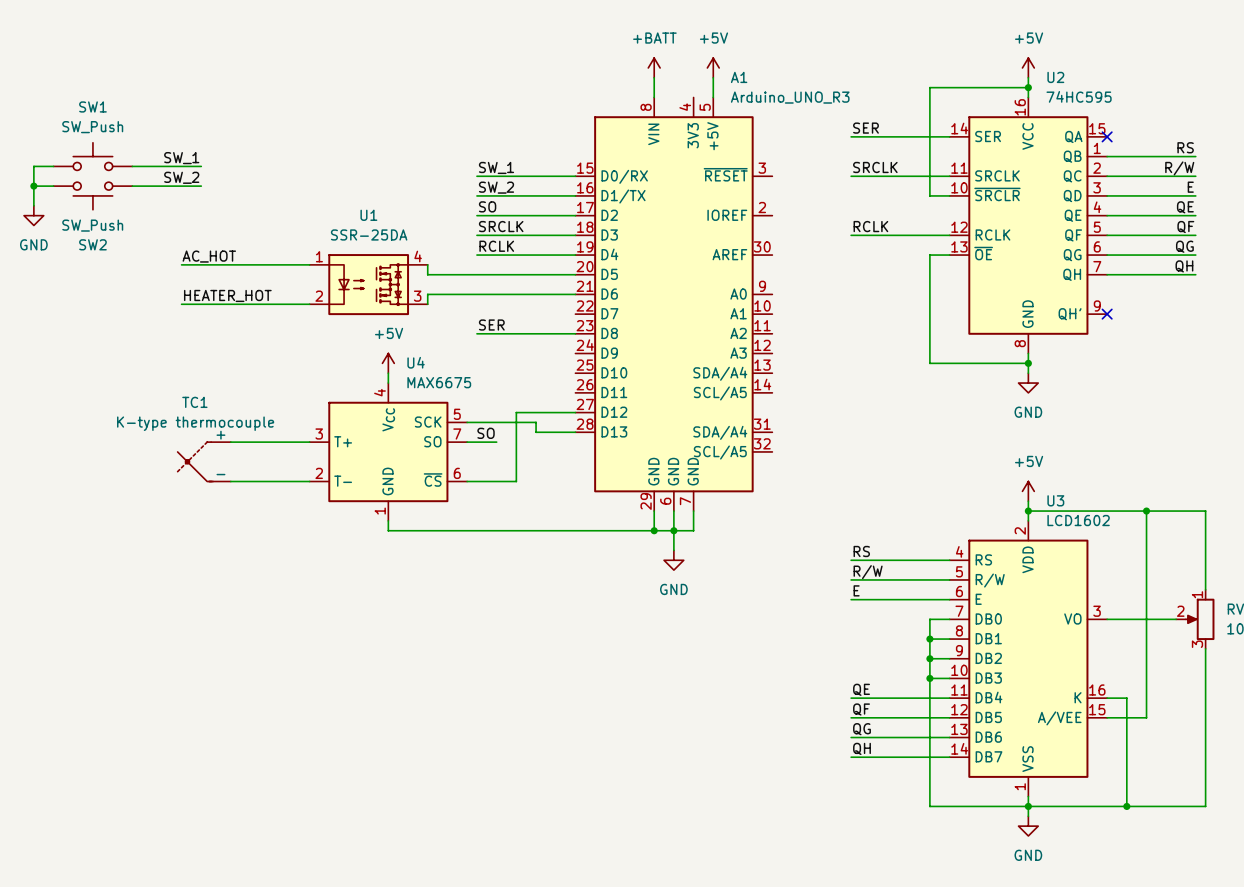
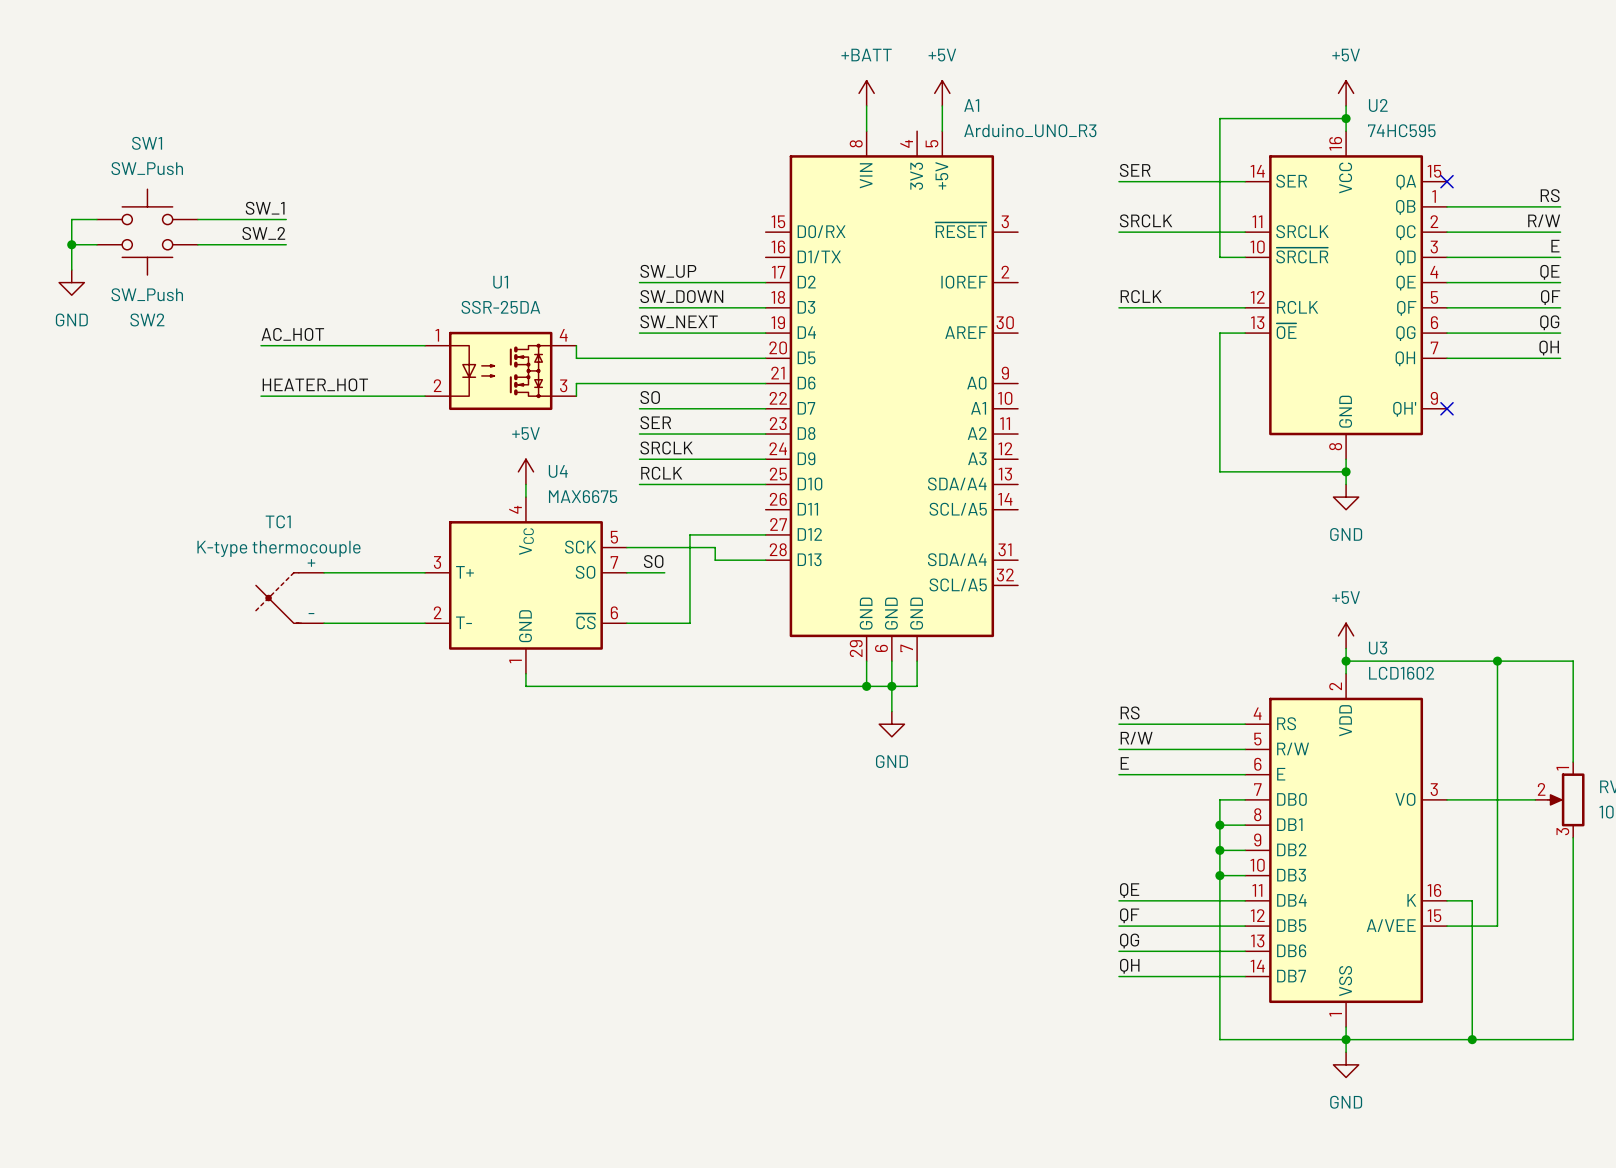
label: SW_1 (496, 167) -> none
wire: (476, 176) (575, 176) -> (639, 459) (765, 459)
label: SW_2 (496, 187) -> none
wire: (476, 195) (575, 195) -> (639, 408) (765, 408)
label: SO (487, 206) -> SW_UP (668, 271)
label: SRCLK (501, 226) -> SW_DOWN (681, 296)
label: RCLK (496, 246) -> SW_NEXT (679, 321)
label: none -> SO (650, 397)
label: none -> SRCLK (666, 447)
label: none -> RCLK (661, 473)
wire: none -> (639, 484) (765, 484)

